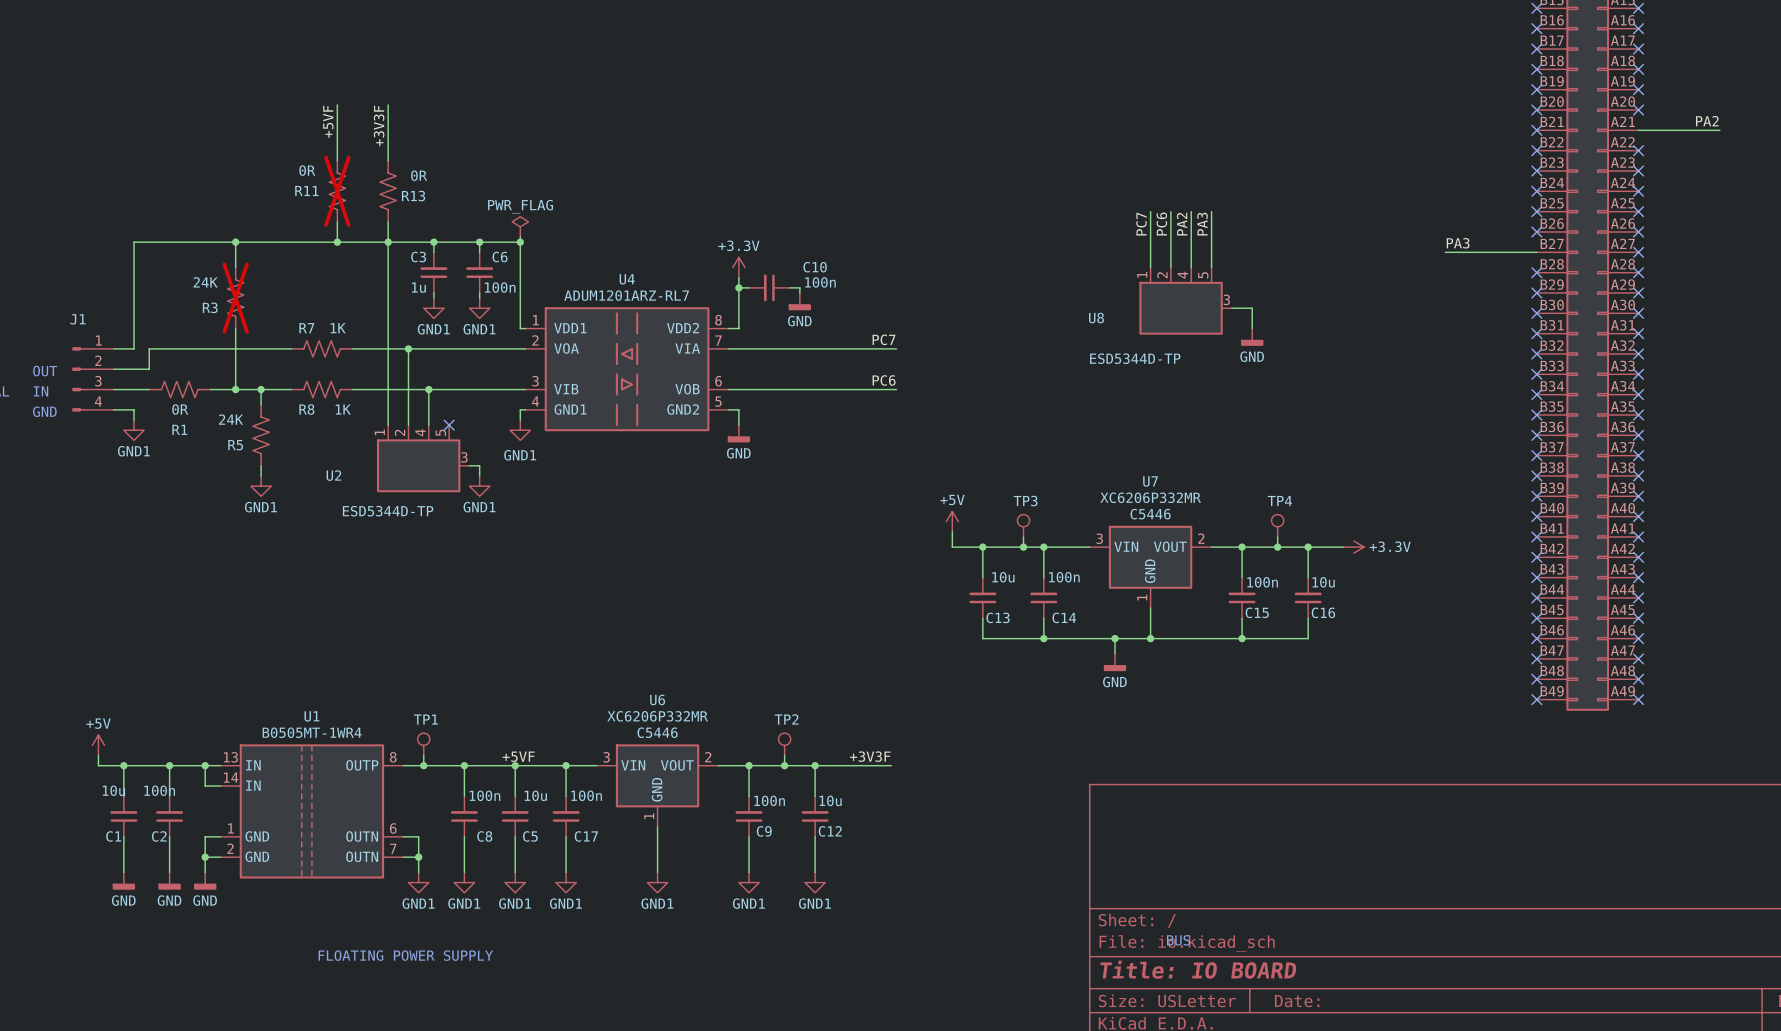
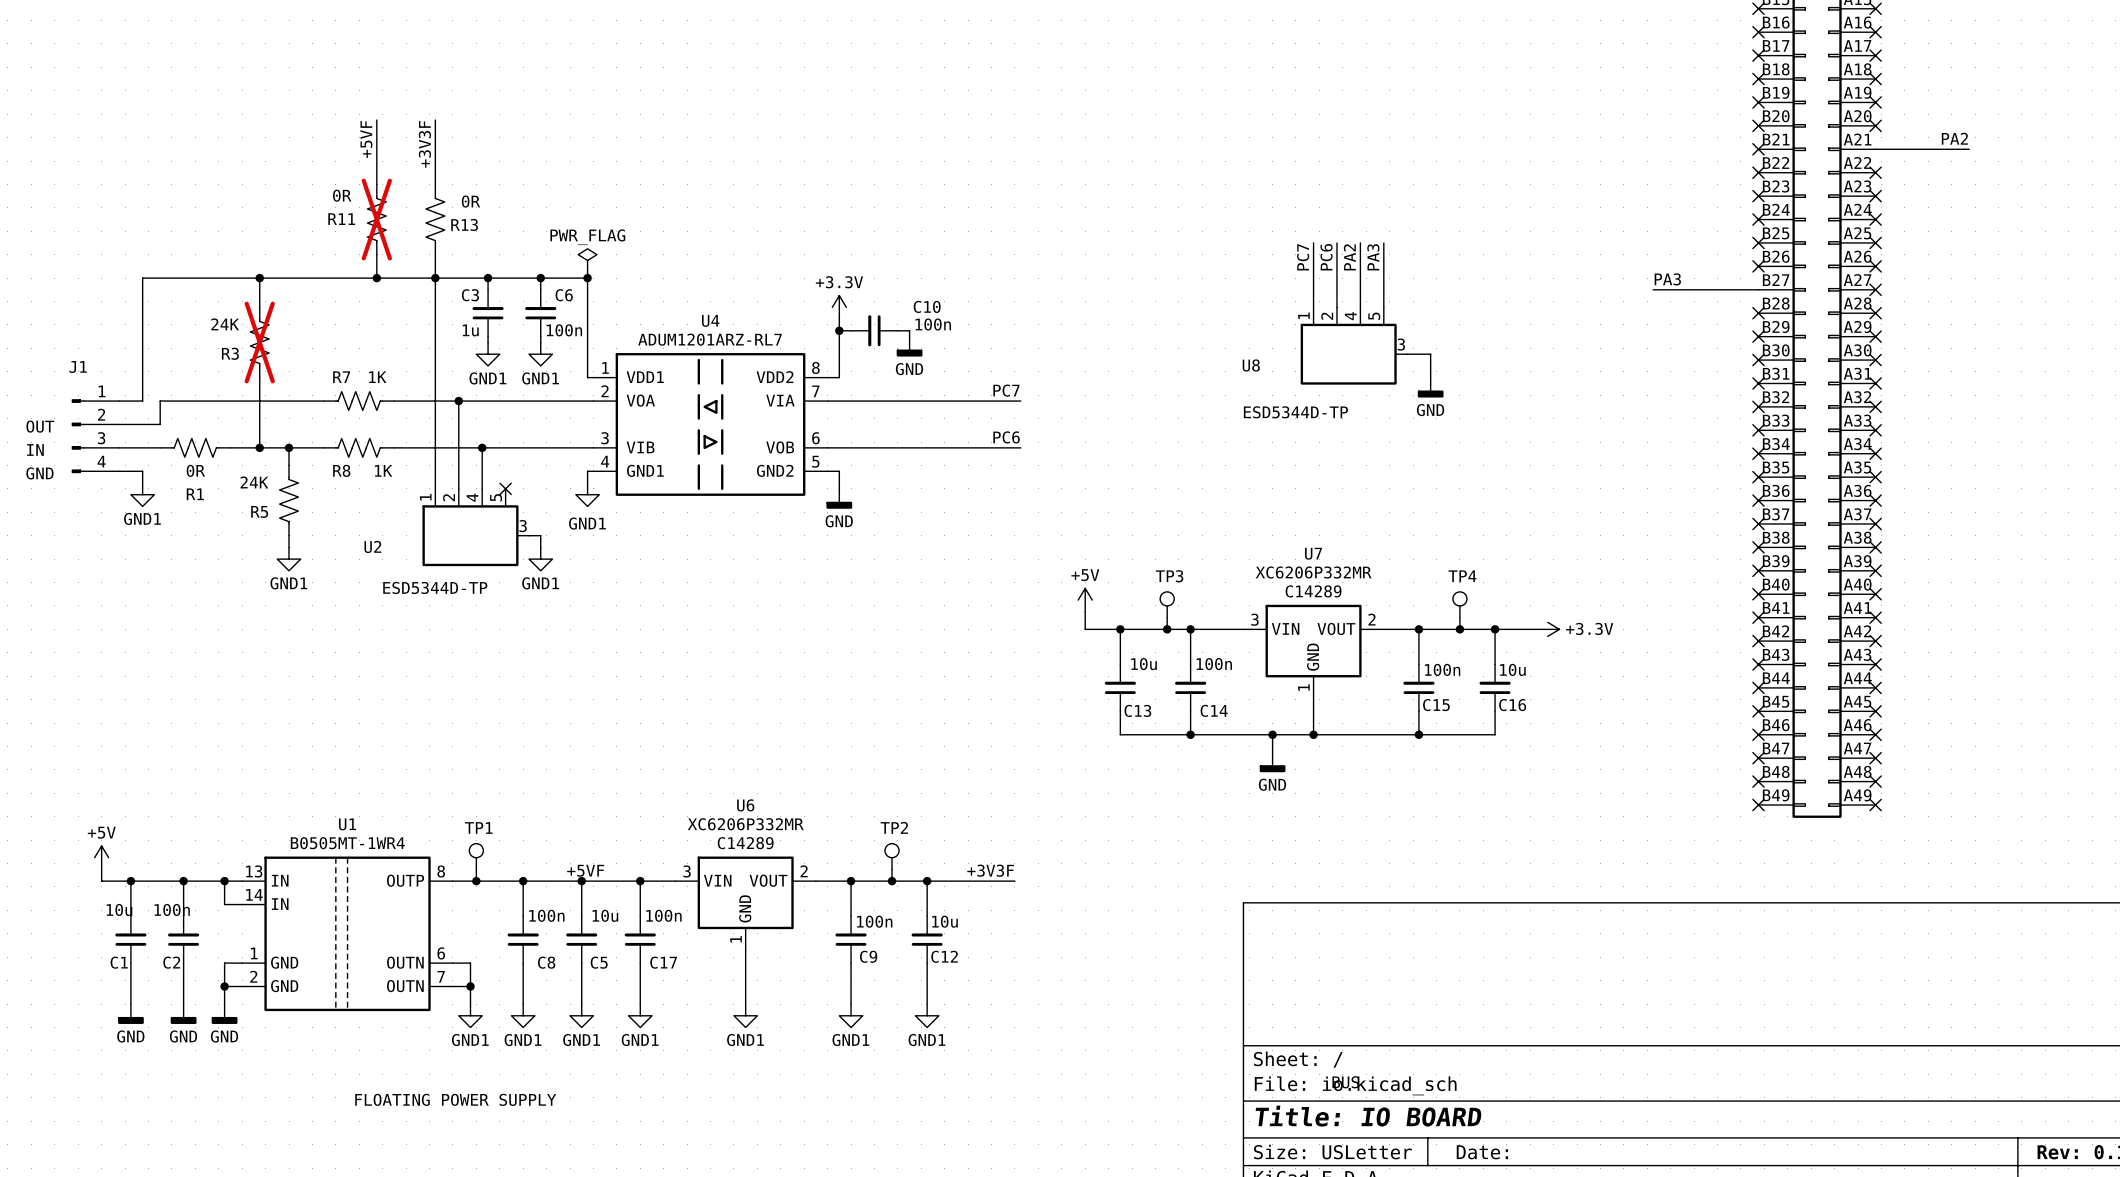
U7 text: C5446 (1150, 514) -> C14289 (1313, 591)
U6 text: C5446 (657, 732) -> C14289 (745, 843)

